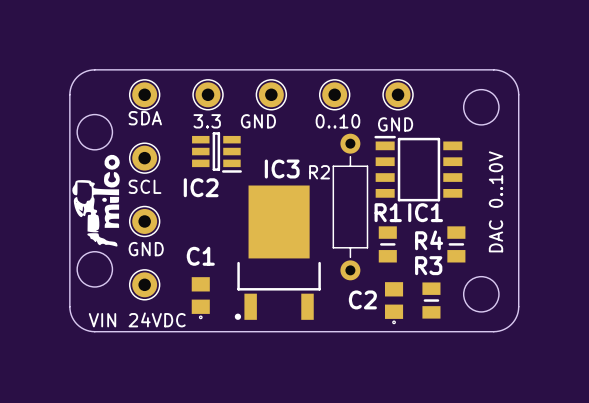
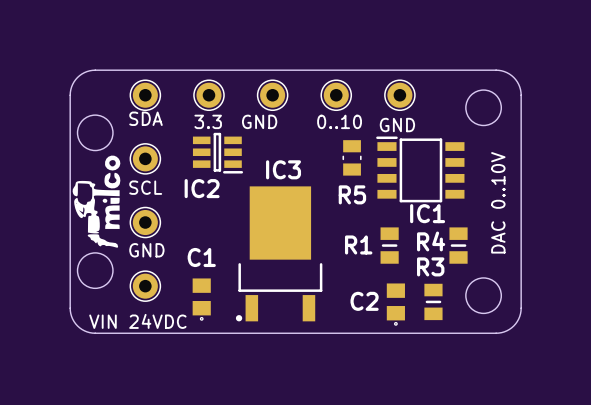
R5: none -> (352, 157)
R2: (350, 207) -> none
R1 name position: R1 (388, 212) -> R1 (358, 244)

